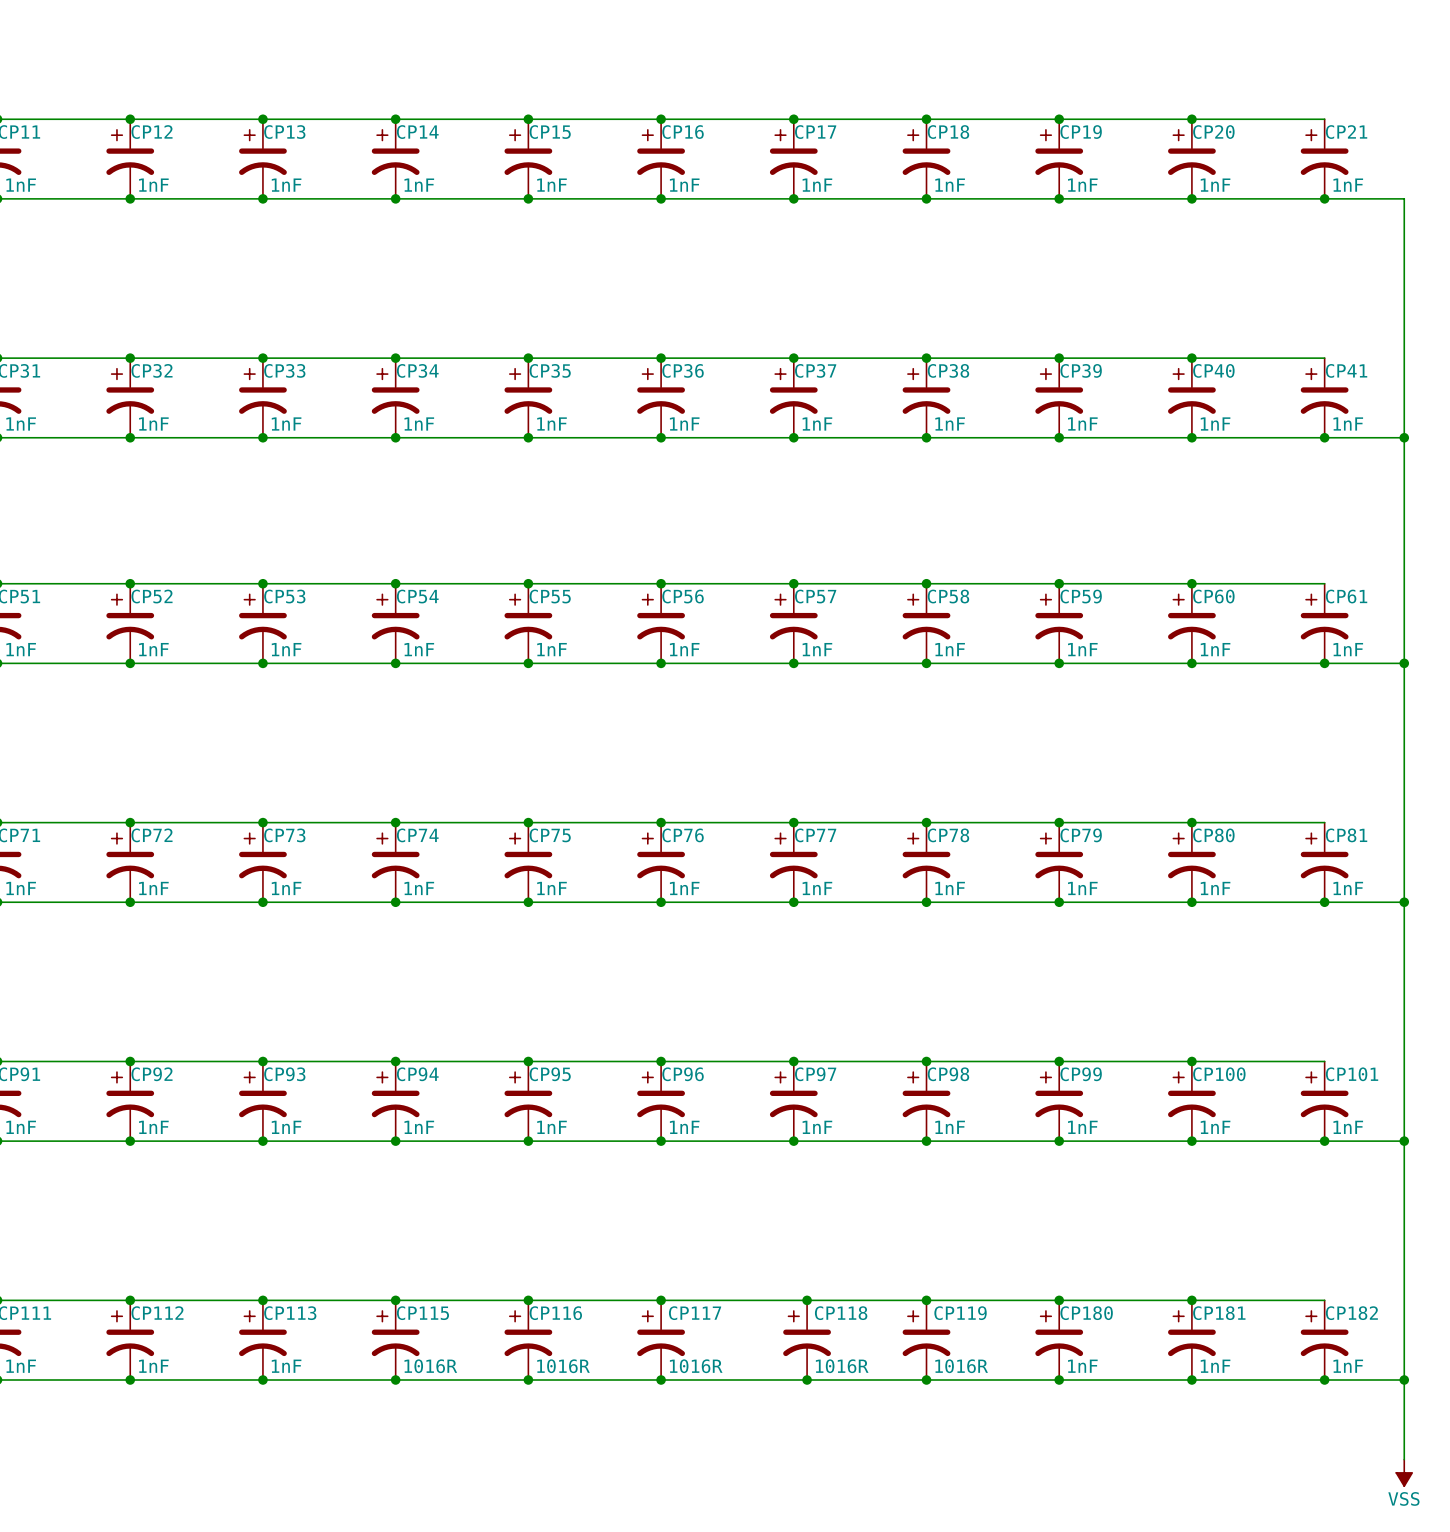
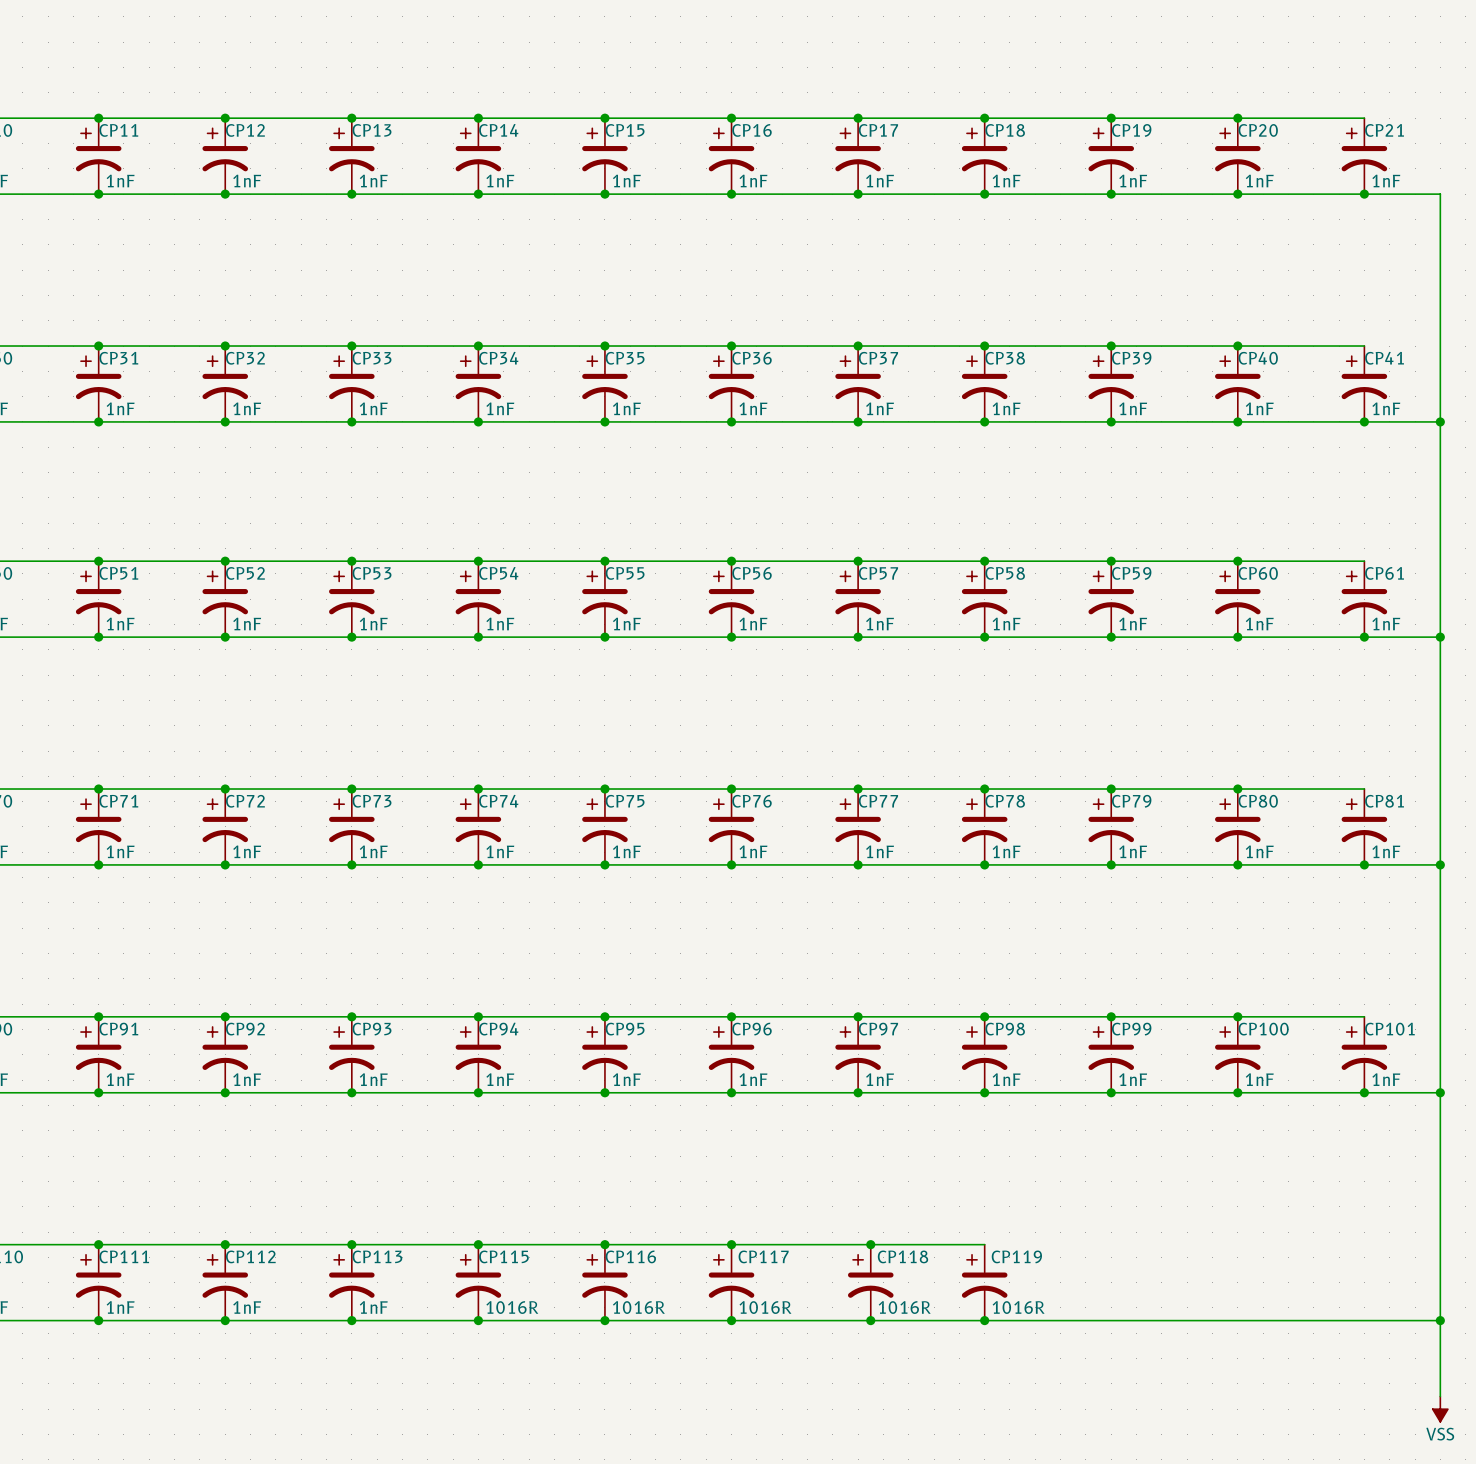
wire: (926, 1300) (1324, 1300) -> none
junction: (926, 1300) -> none
junction: (1059, 1300) -> none
junction: (1191, 1300) -> none
CP180: 1nF (1059, 1340) -> none
CP181: 1nF (1191, 1340) -> none
CP182: 1nF (1324, 1340) -> none
junction: (1059, 1379) -> none
junction: (1191, 1379) -> none
junction: (1324, 1379) -> none

